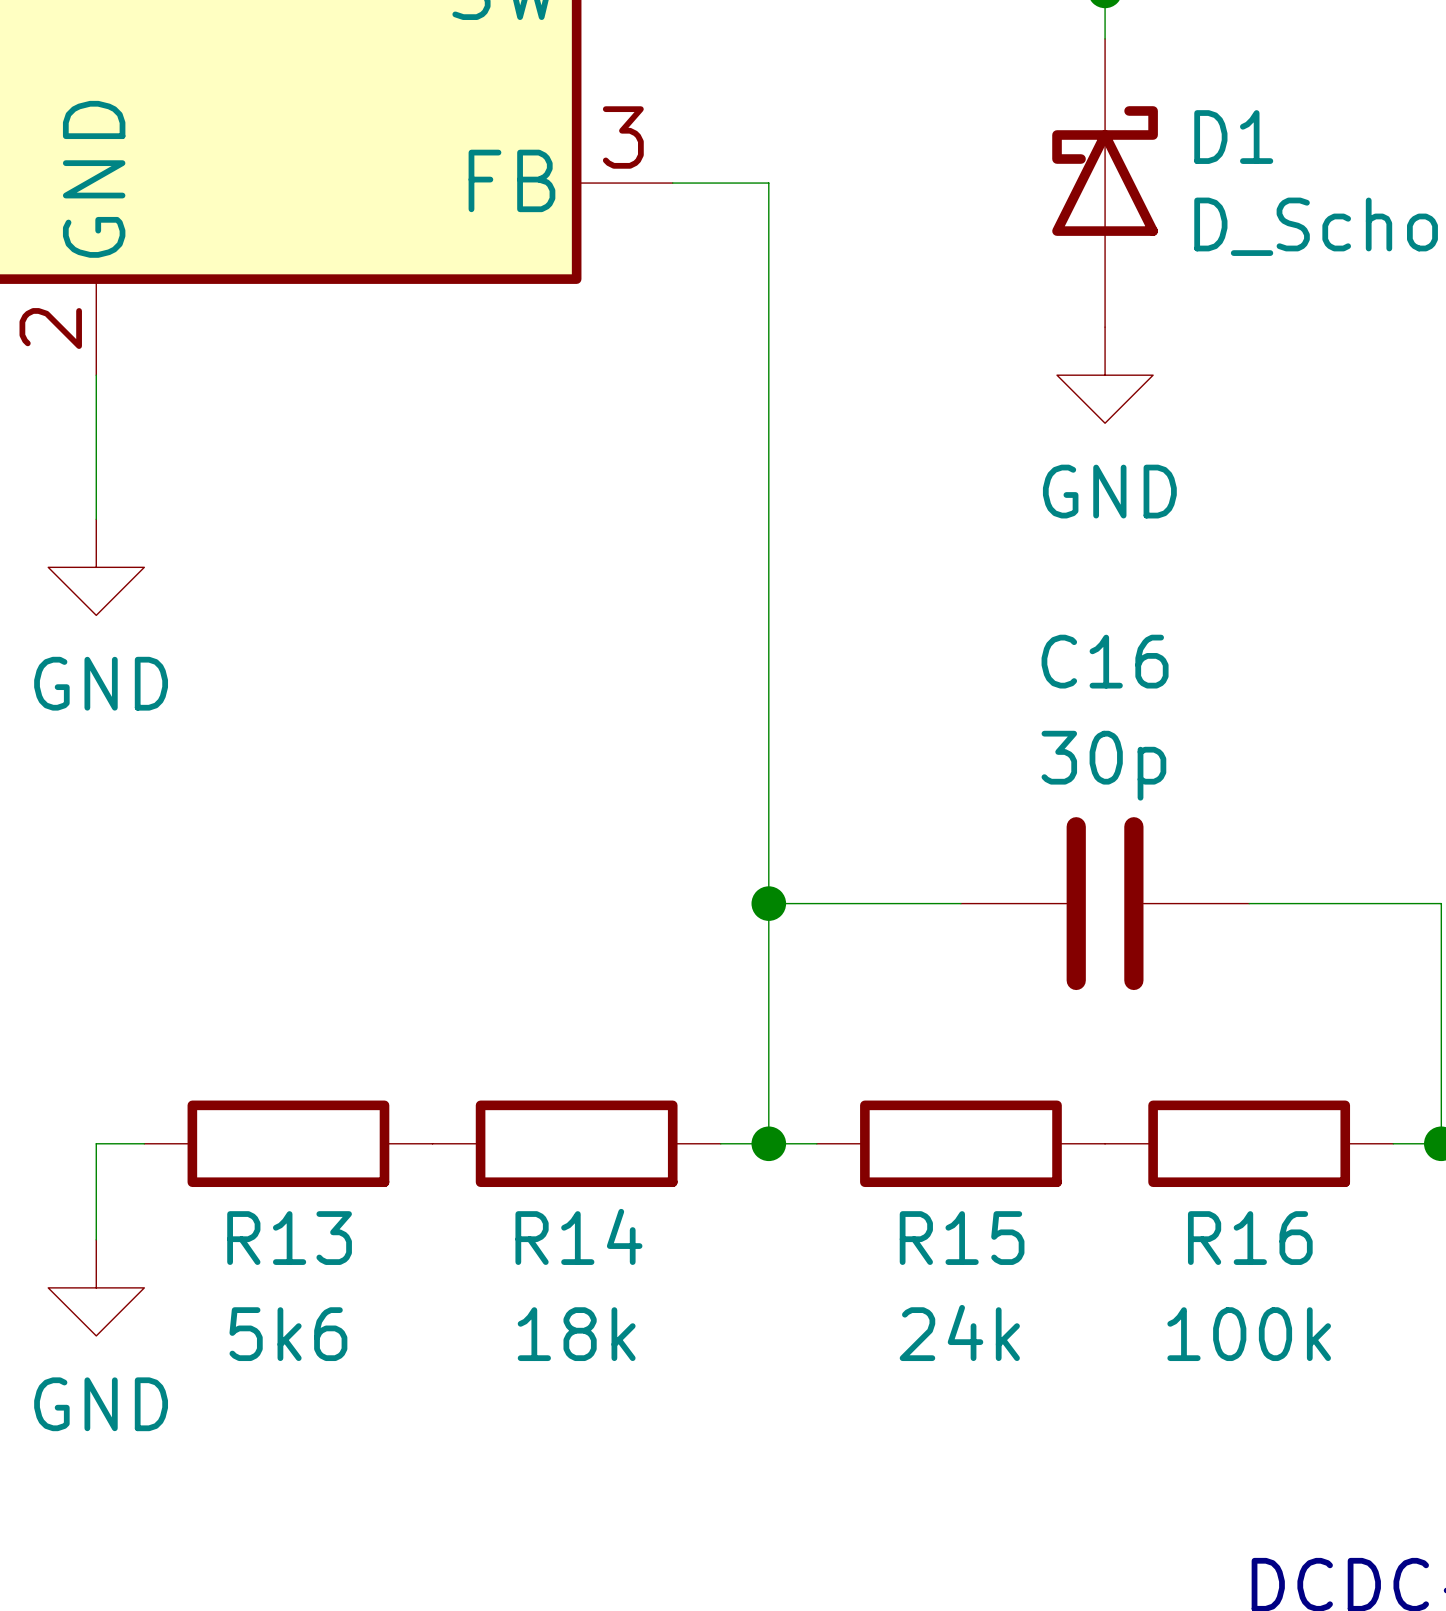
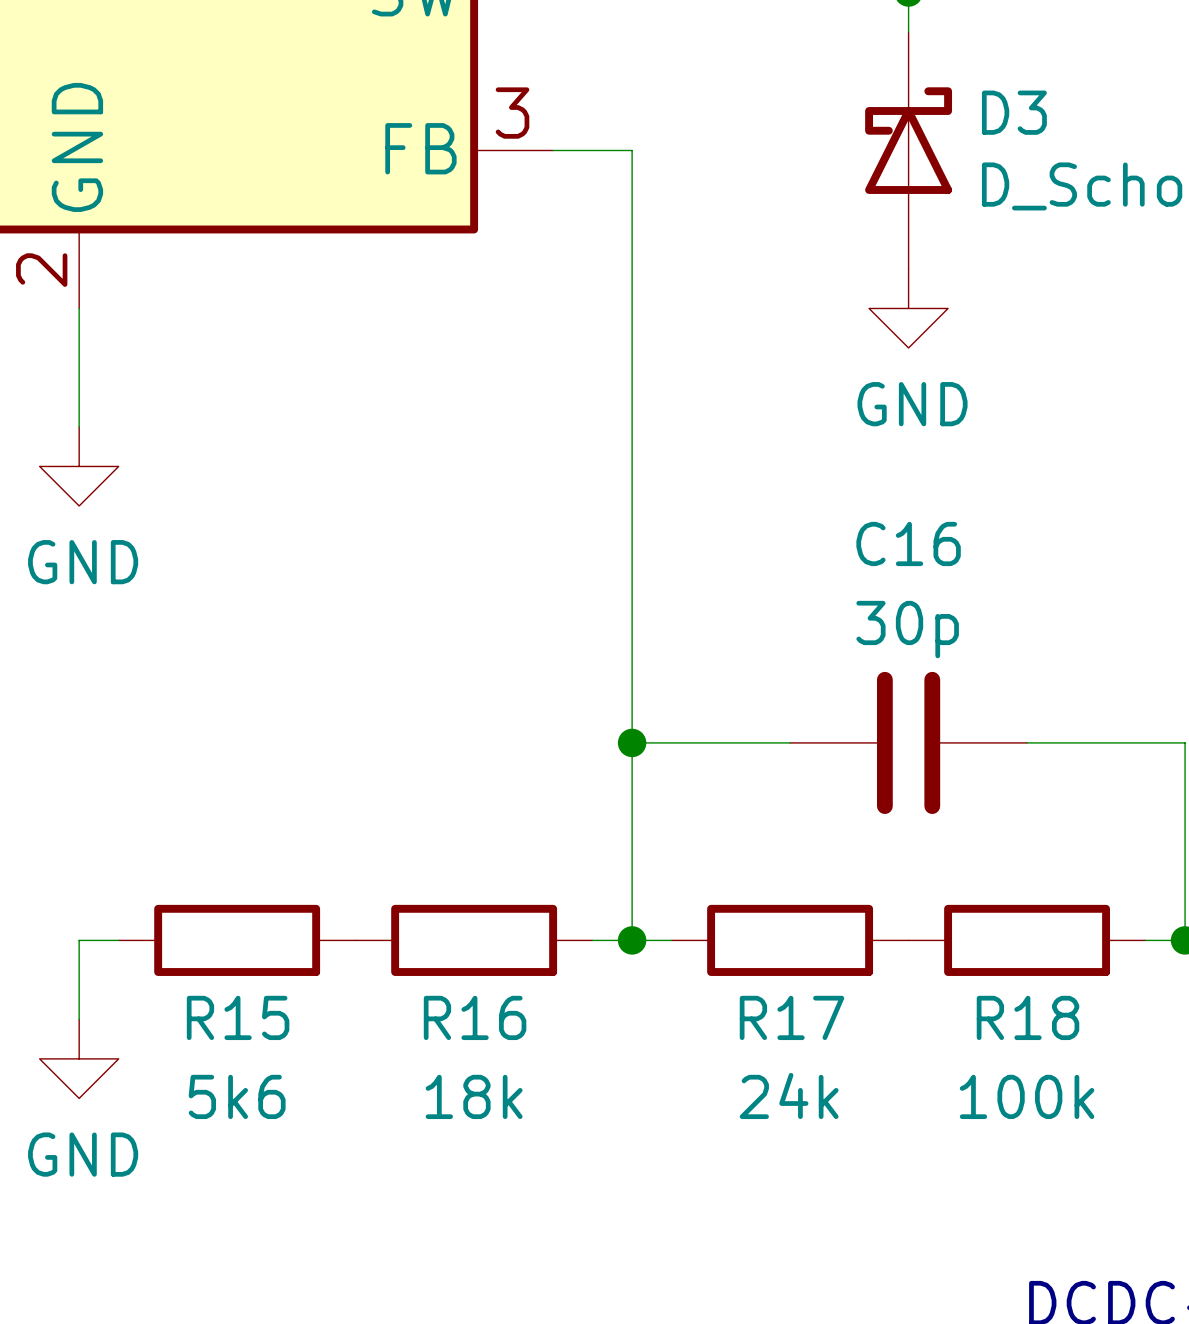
D1 name: D1 (1233, 137) -> D3 (1014, 112)
R14 name: R14 (578, 1236) -> R16 (475, 1017)
R13 name: R13 (289, 1238) -> R15 (238, 1017)
R15 name: R15 (962, 1238) -> R17 (791, 1017)
R16 name: R16 (1250, 1238) -> R18 (1028, 1017)

